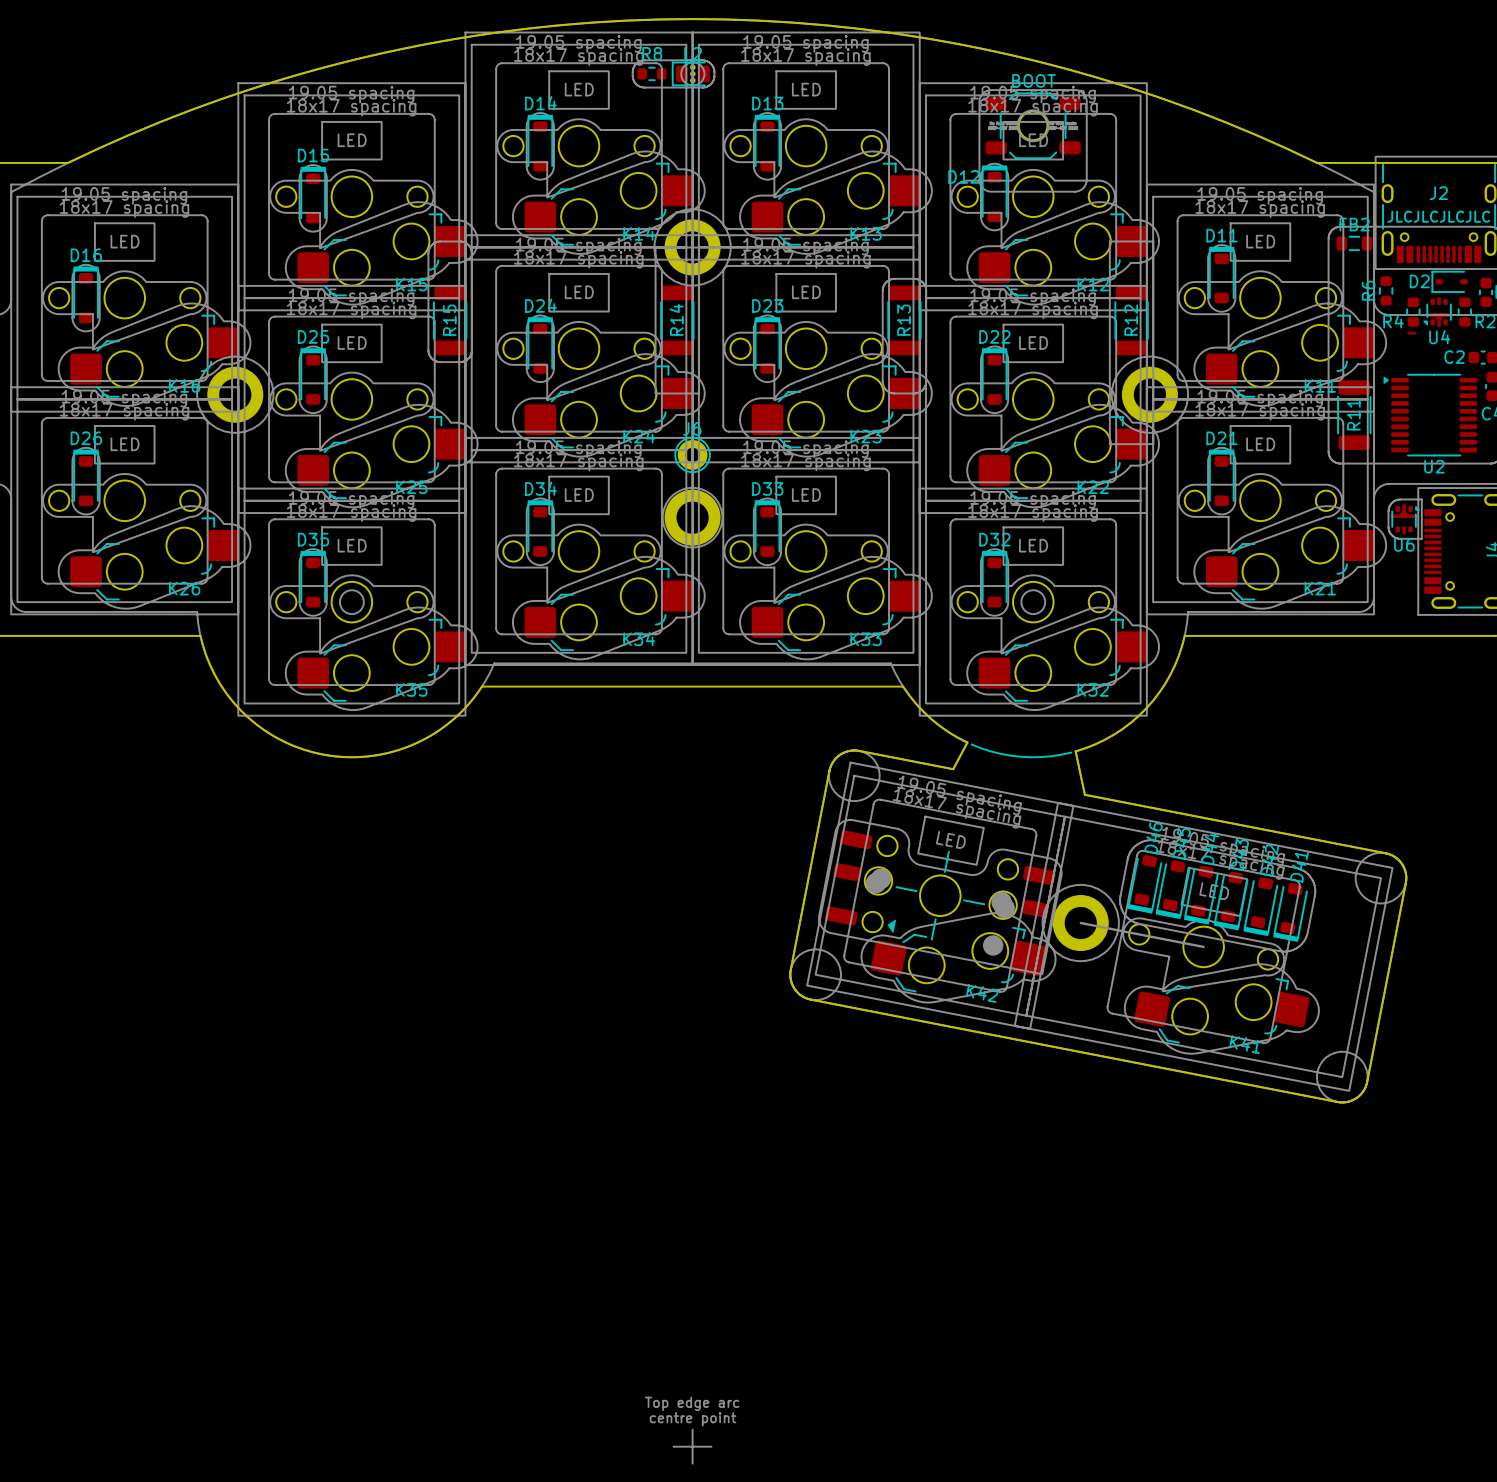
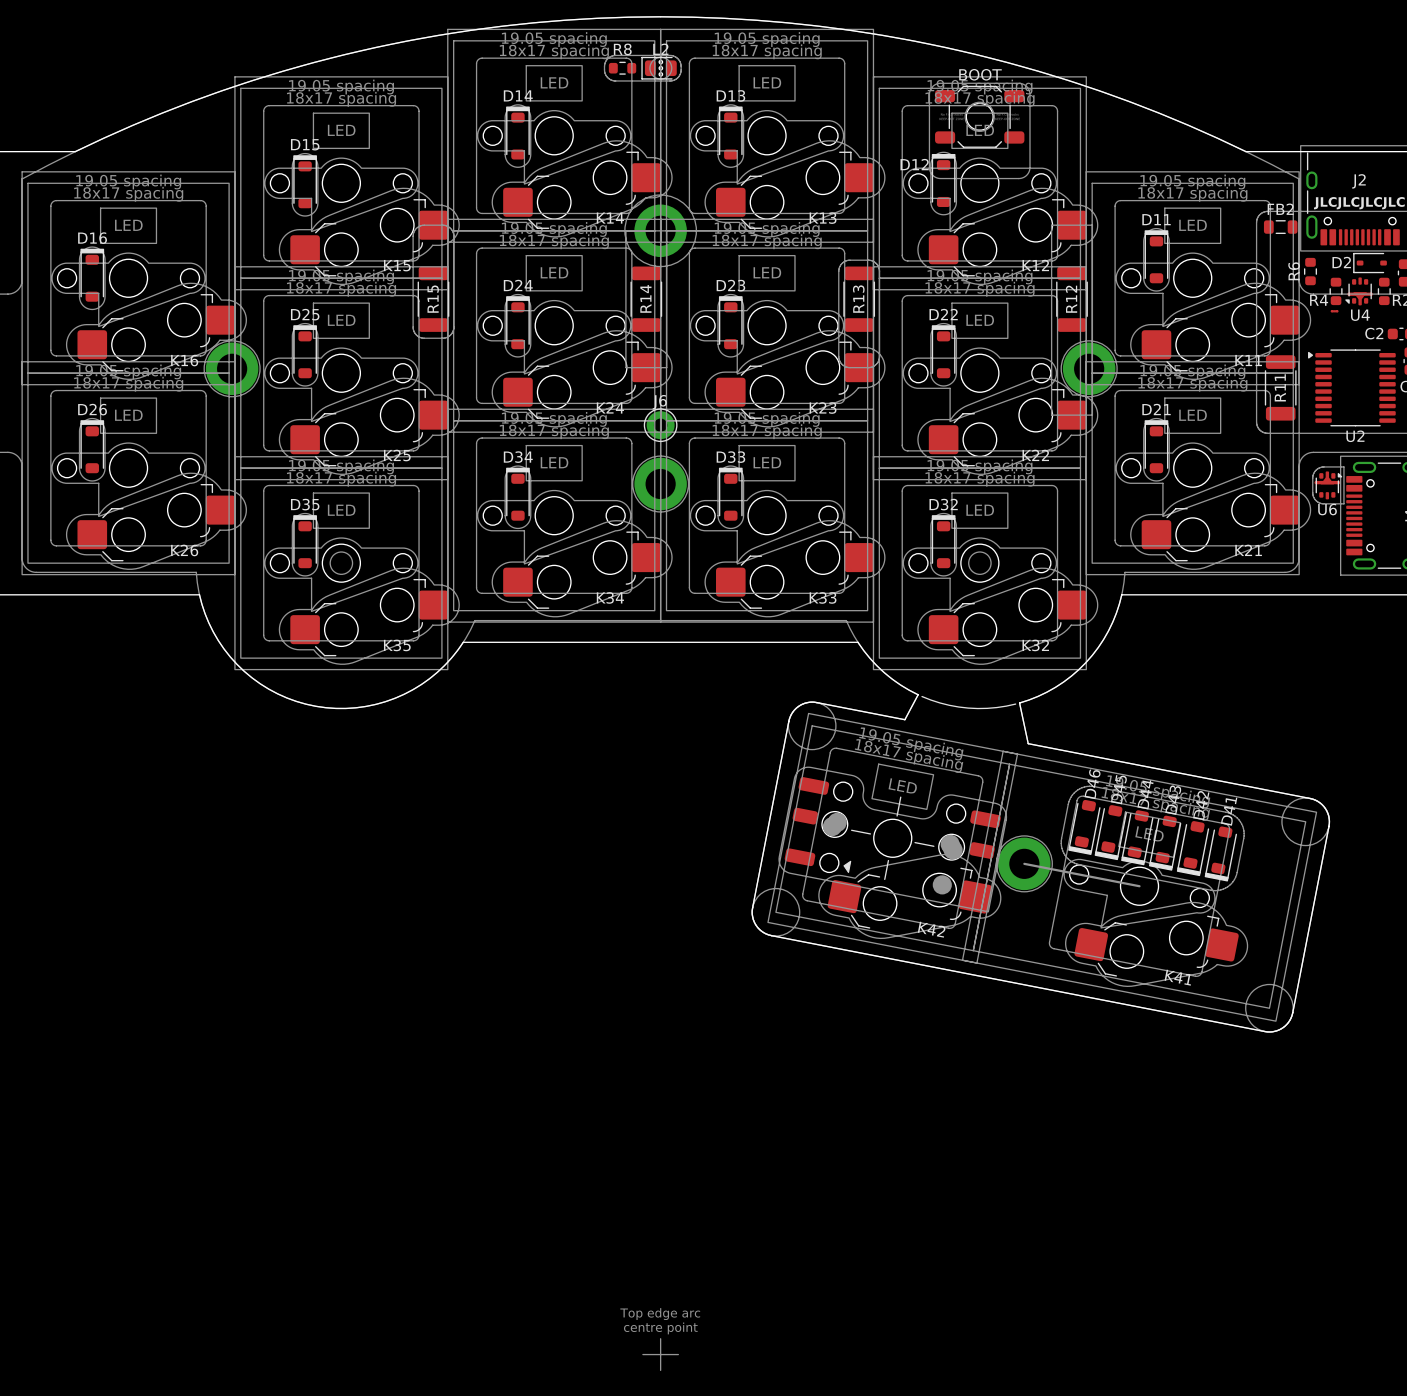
part footprint: [196, 355, 275, 434] -> [203, 340, 261, 398]
part footprint: [1111, 355, 1189, 434] -> [1060, 340, 1118, 398]
part footprint: [1042, 884, 1120, 962] -> [995, 835, 1053, 893]

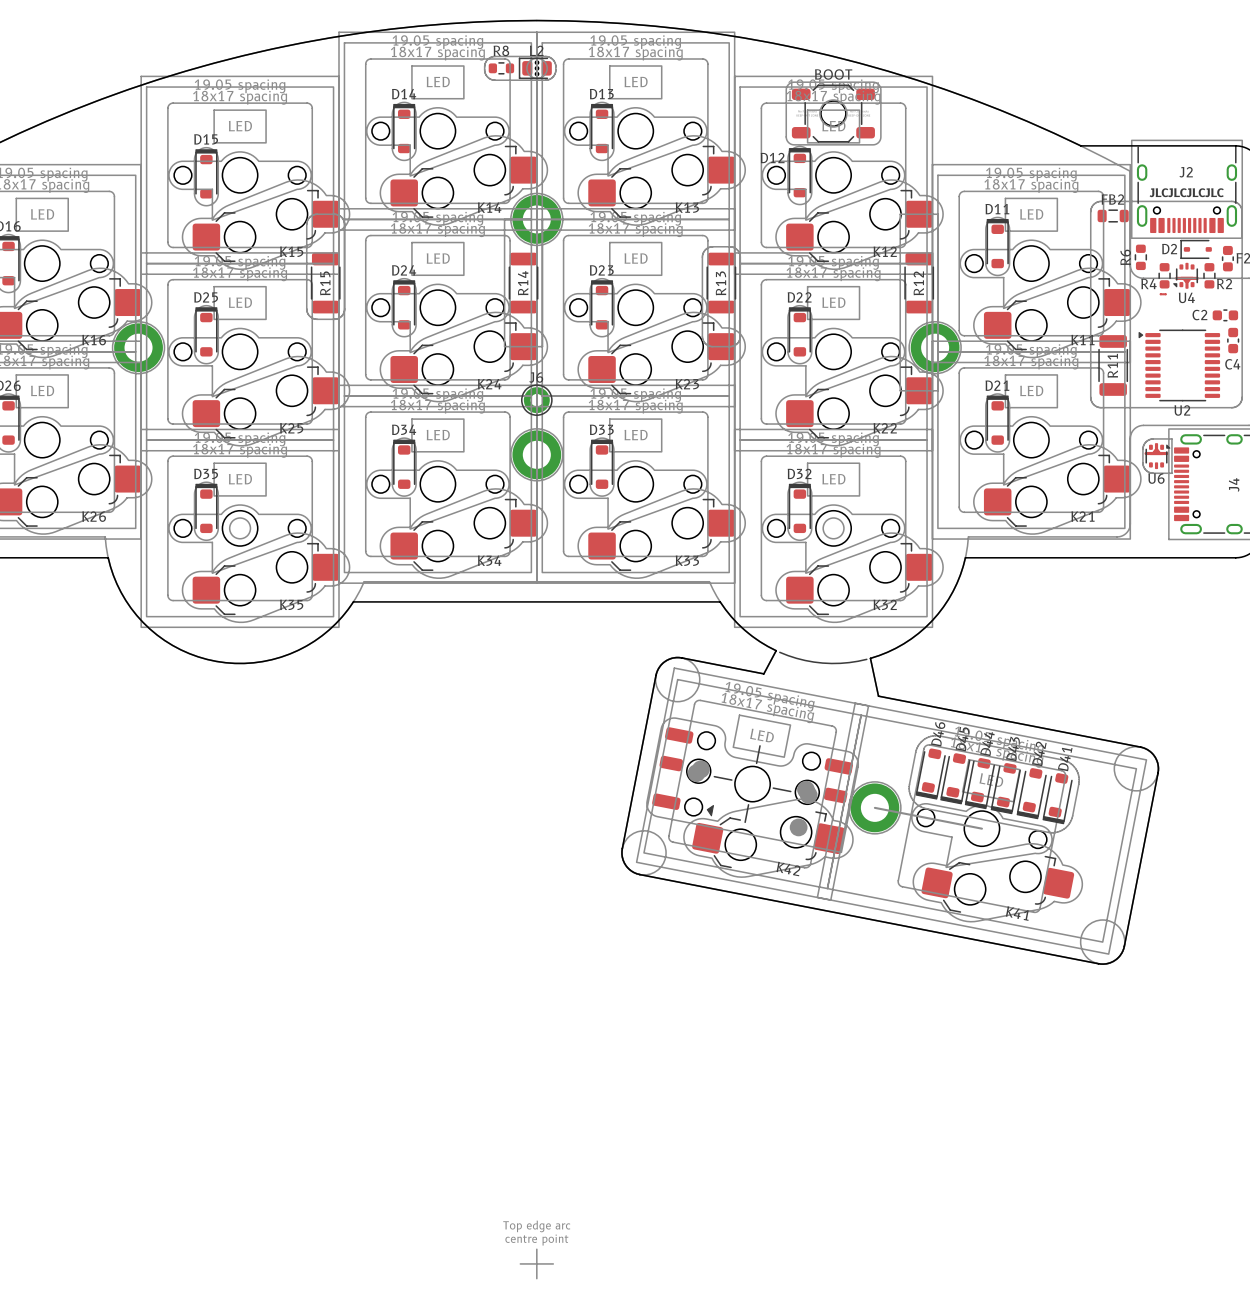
part: none -> BOOT (833, 113)
part: BOOT (979, 130) -> none
part footprint: [624, 194, 697, 268] -> [510, 192, 564, 246]

